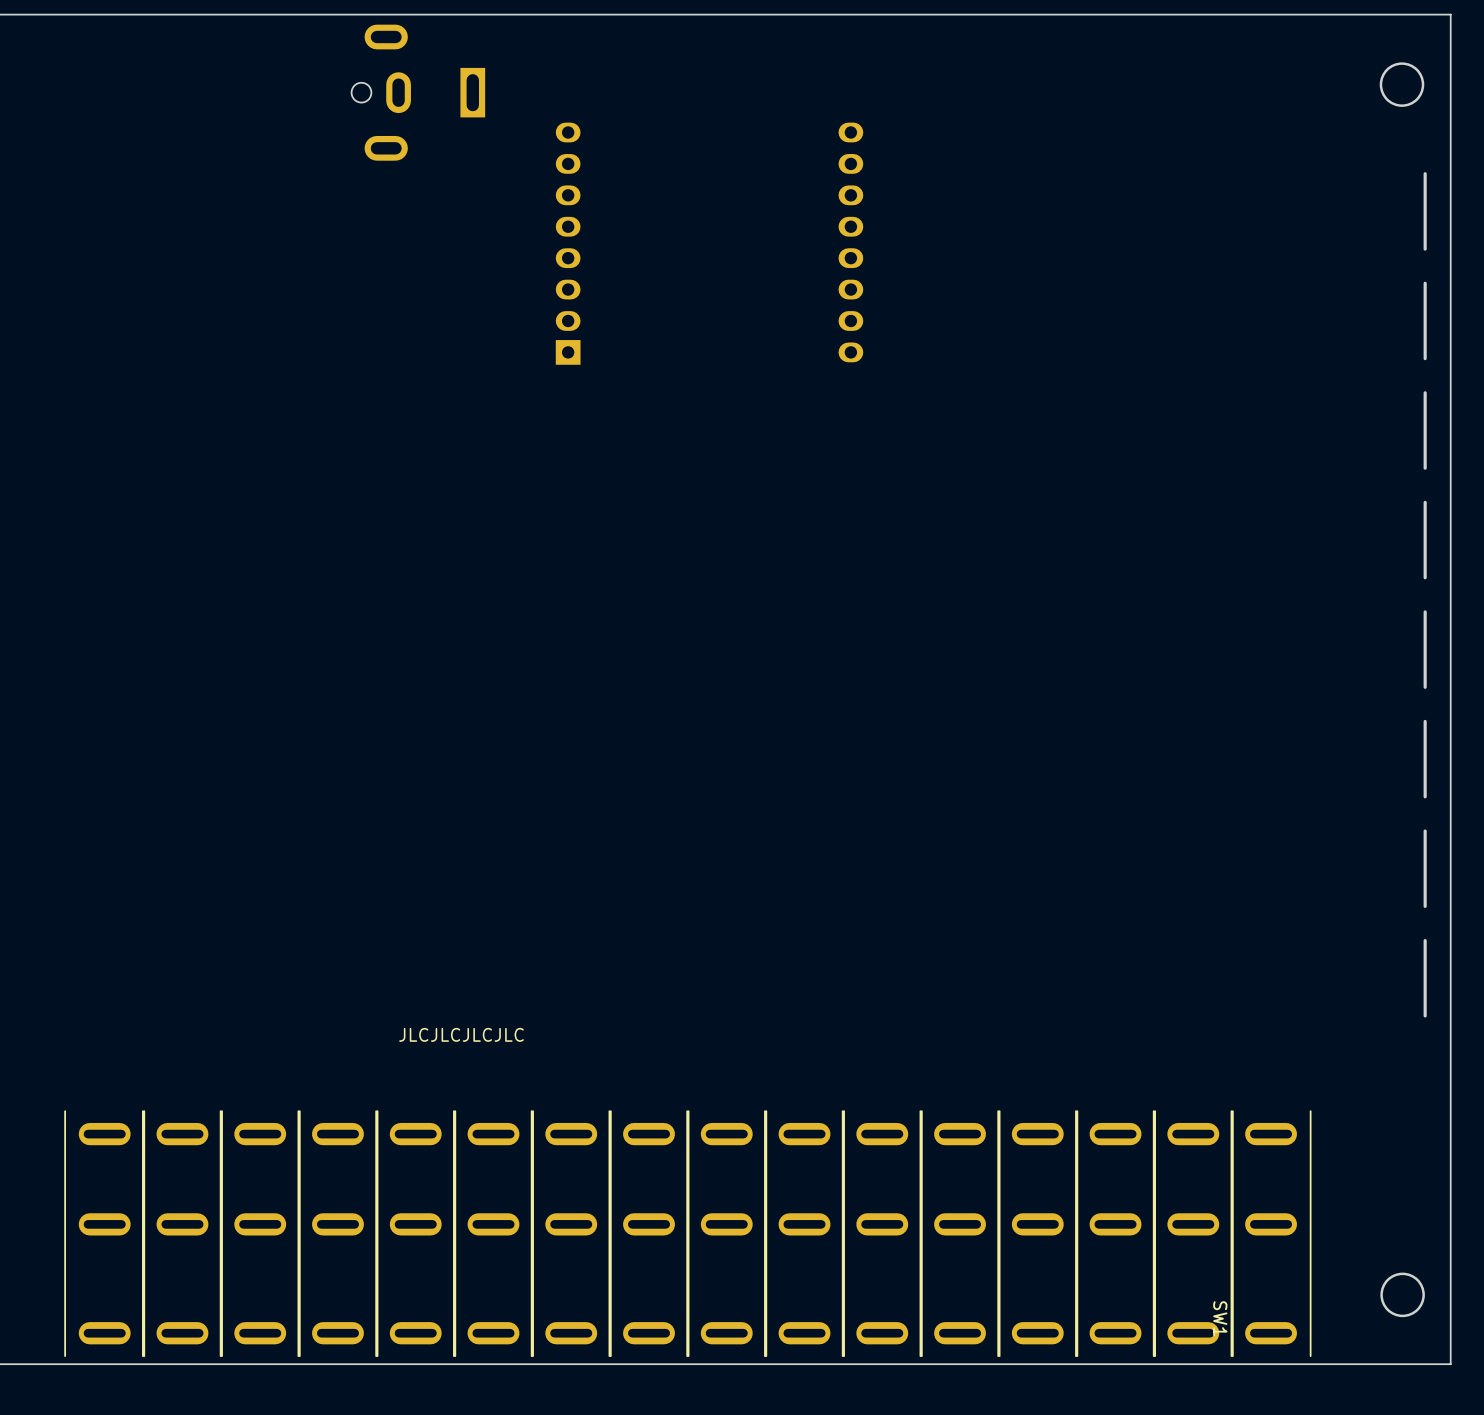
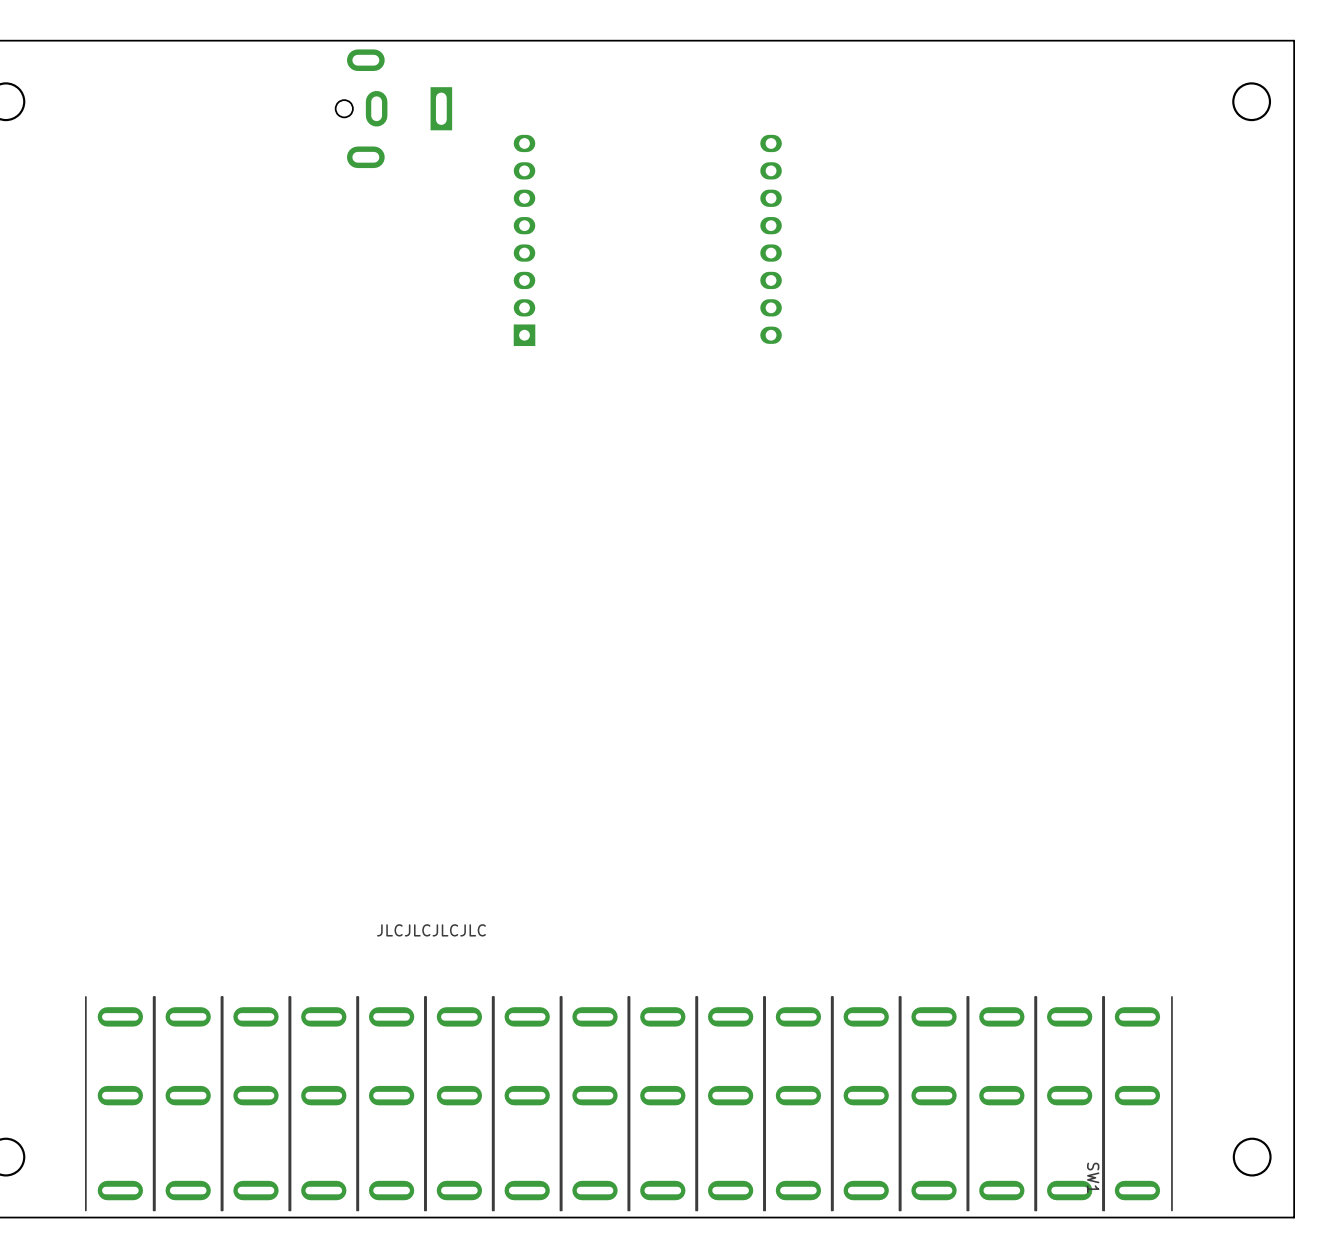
part: (1425, 211) -> none
part: (1425, 320) -> none
part: (1425, 430) -> none
part: (1425, 540) -> none
part: (1425, 649) -> none
part: (1425, 759) -> none
part: (1425, 868) -> none
part: (1425, 978) -> none

